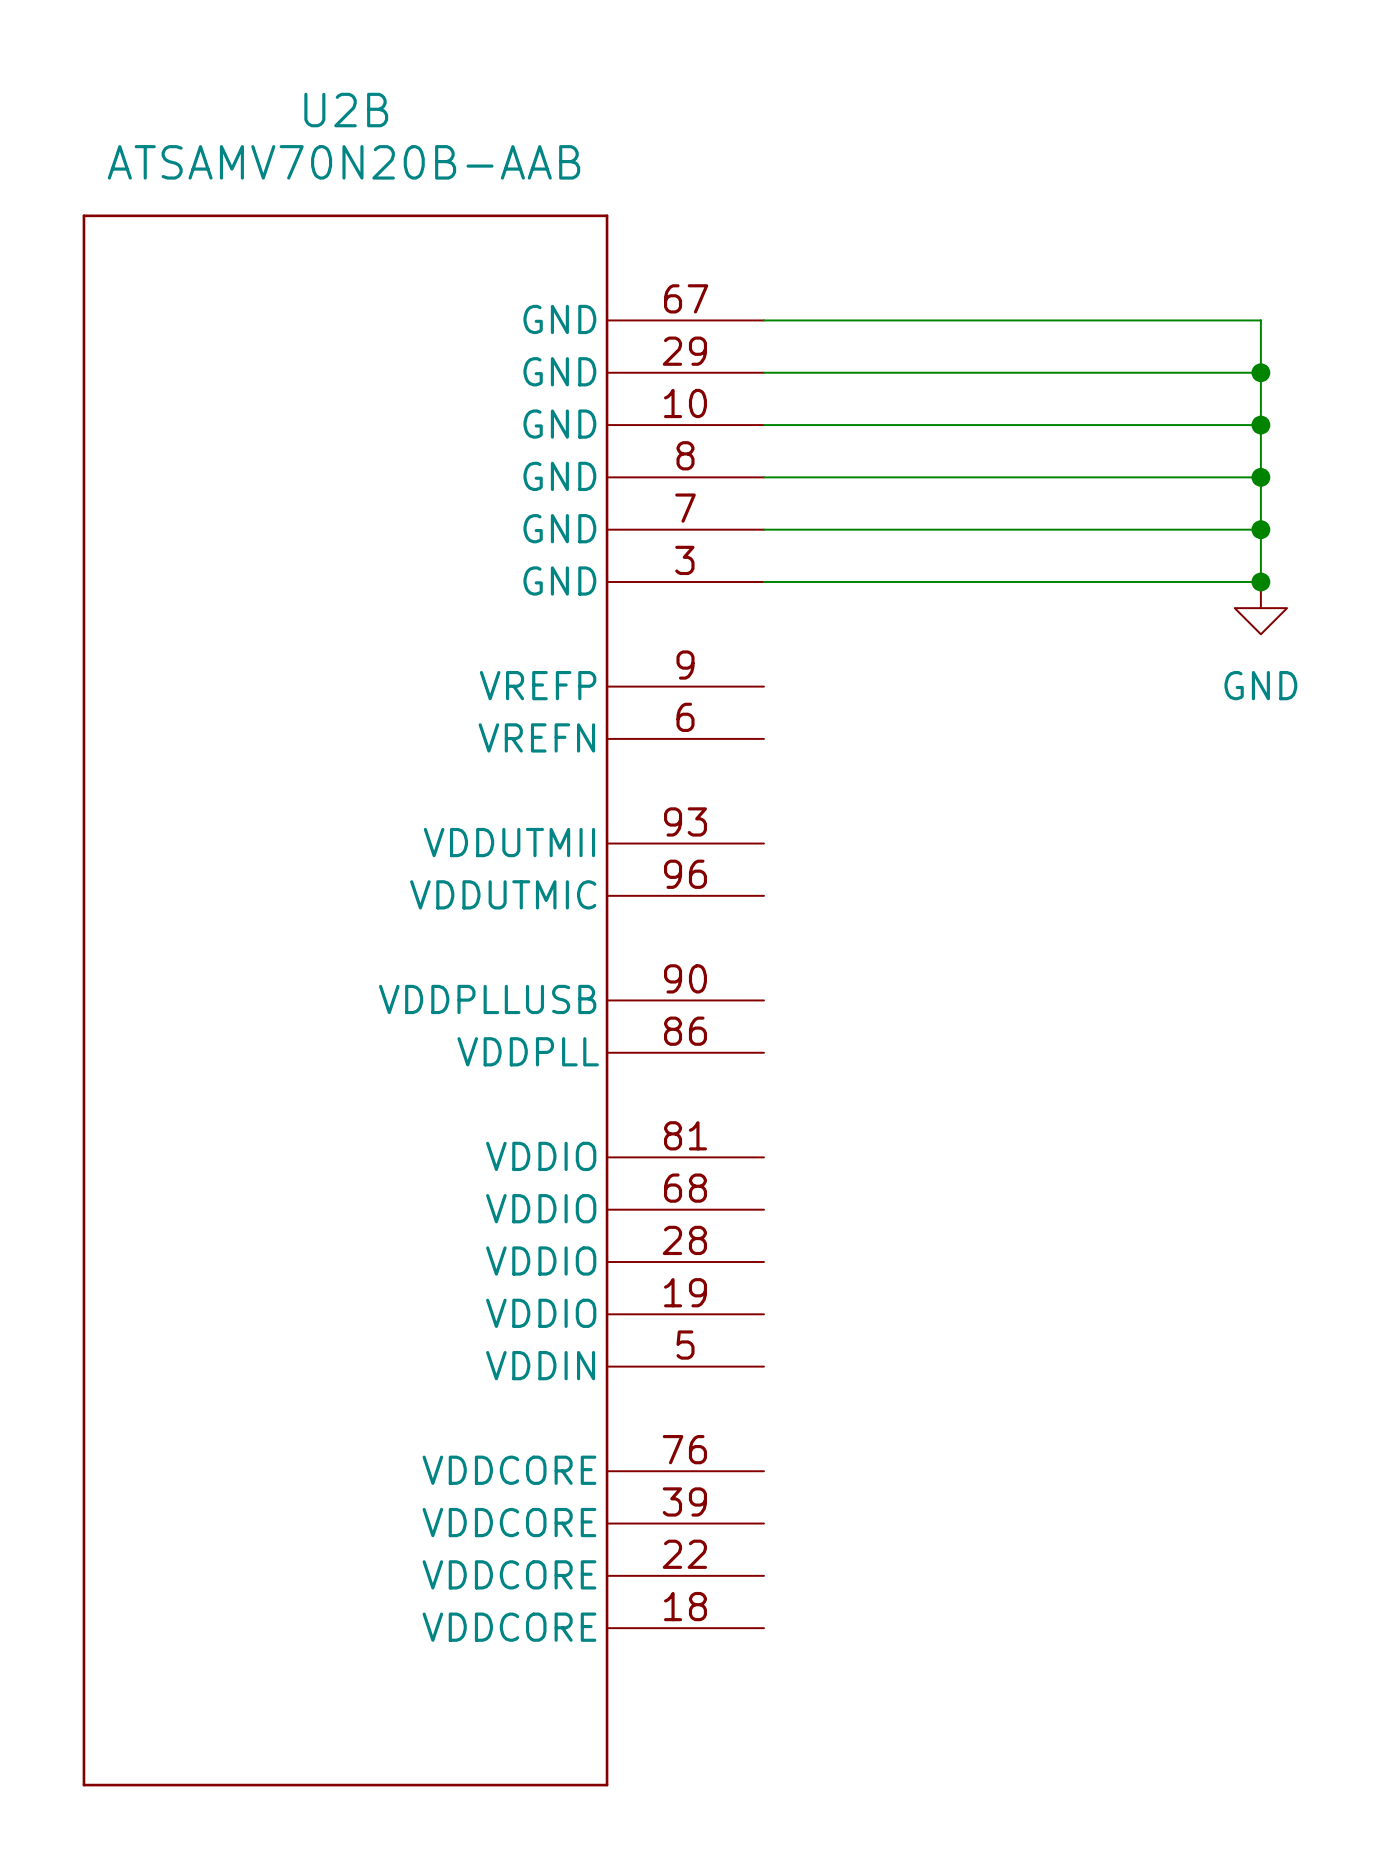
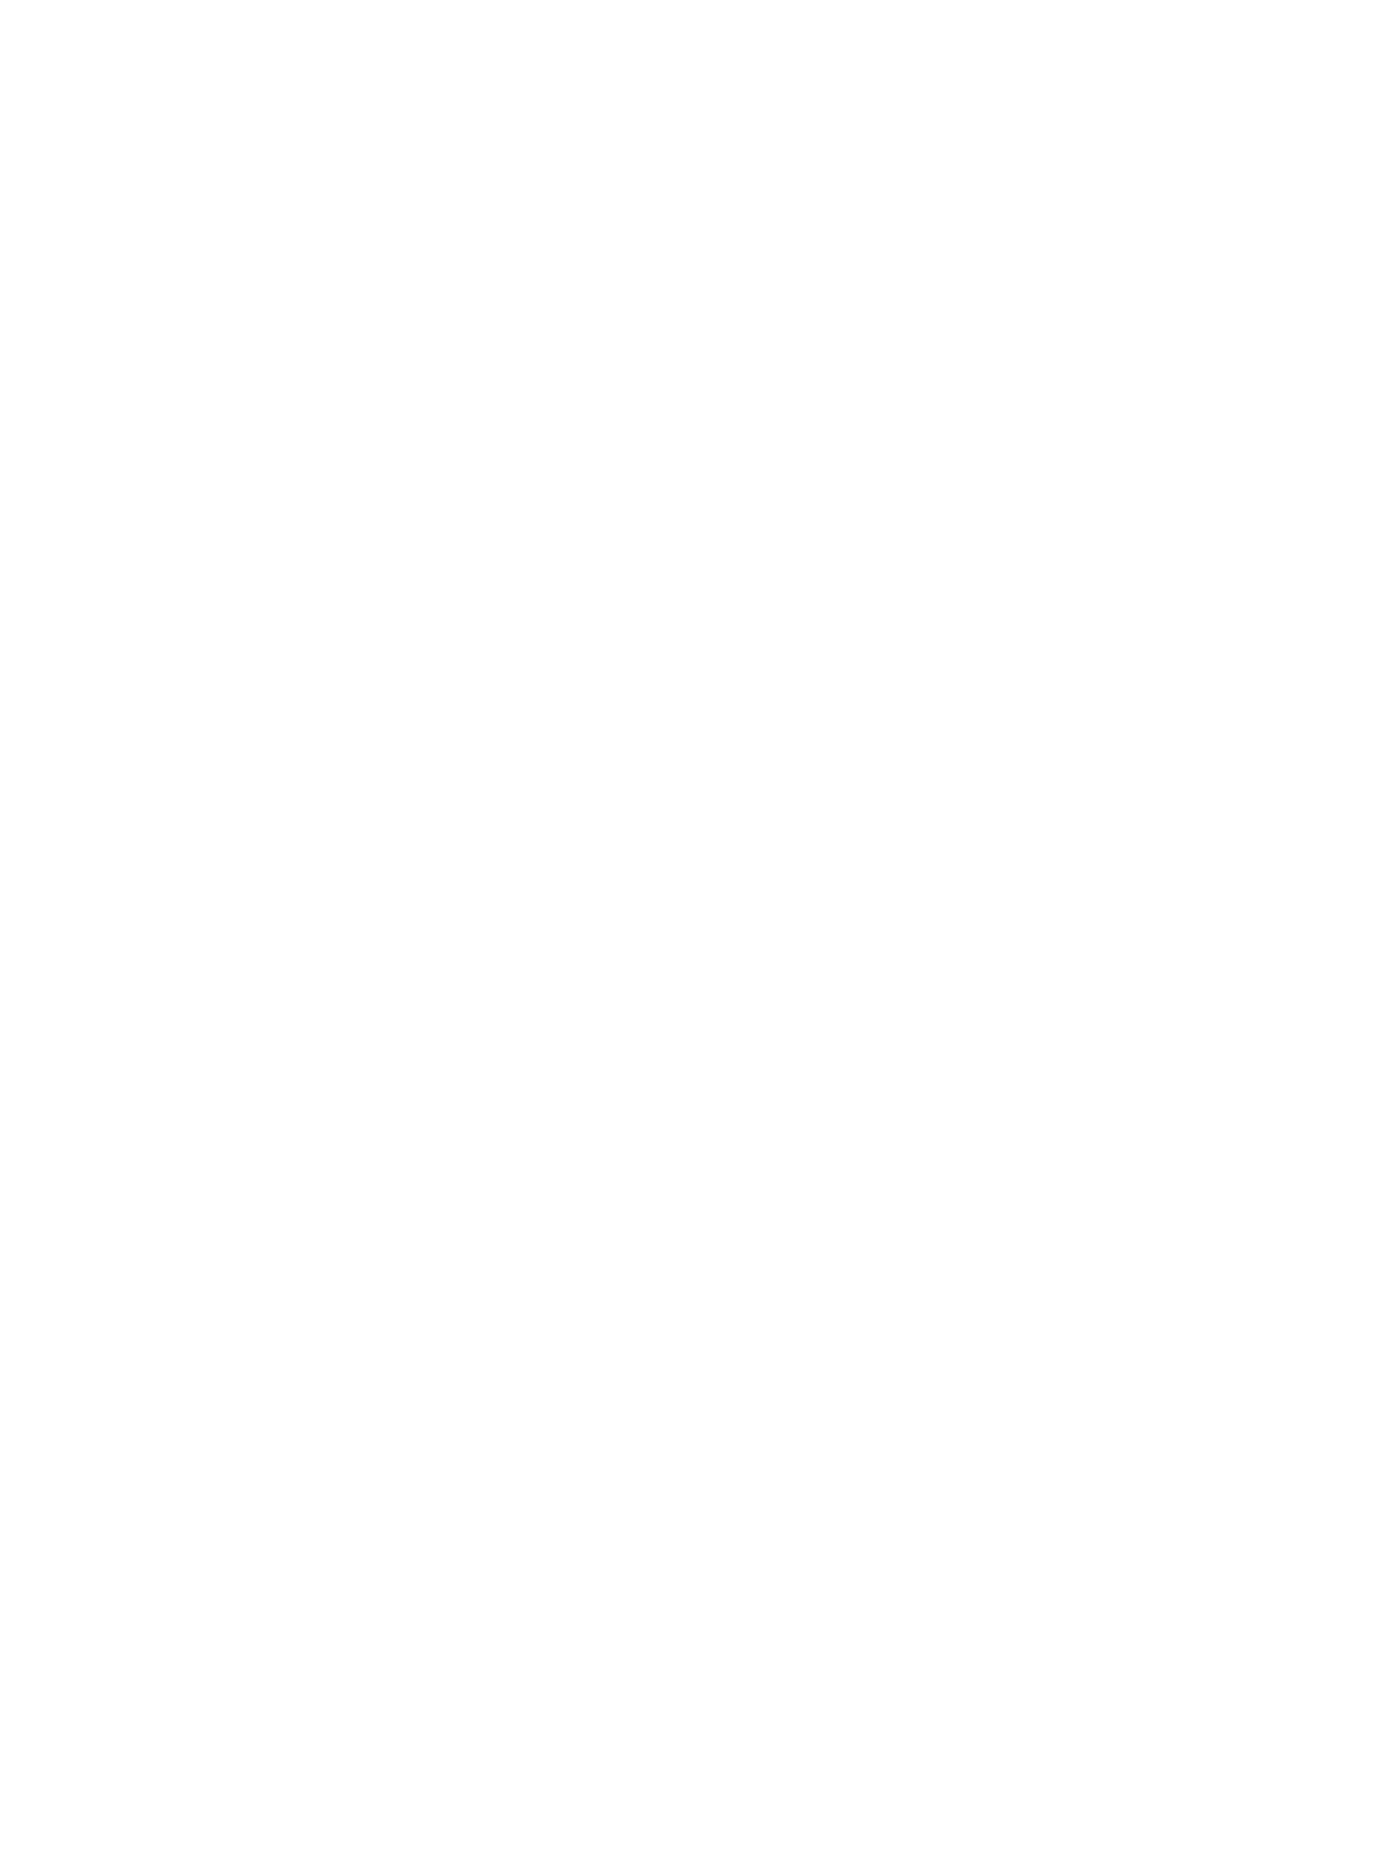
wire: (763, 320) (1260, 320) (1260, 581) (763, 581) -> none
wire: (763, 372) (1260, 372) -> none
junction: (1260, 372) -> none
wire: (763, 425) (1260, 425) -> none
junction: (1260, 425) -> none
wire: (763, 477) (1260, 477) -> none
junction: (1260, 477) -> none
wire: (763, 529) (1260, 529) -> none
junction: (1260, 529) -> none
junction: (1260, 581) -> none
power symbol: GND (1260, 608) -> none
U2B: ATSAMV70N20B-AAB (423, 1000) -> none

